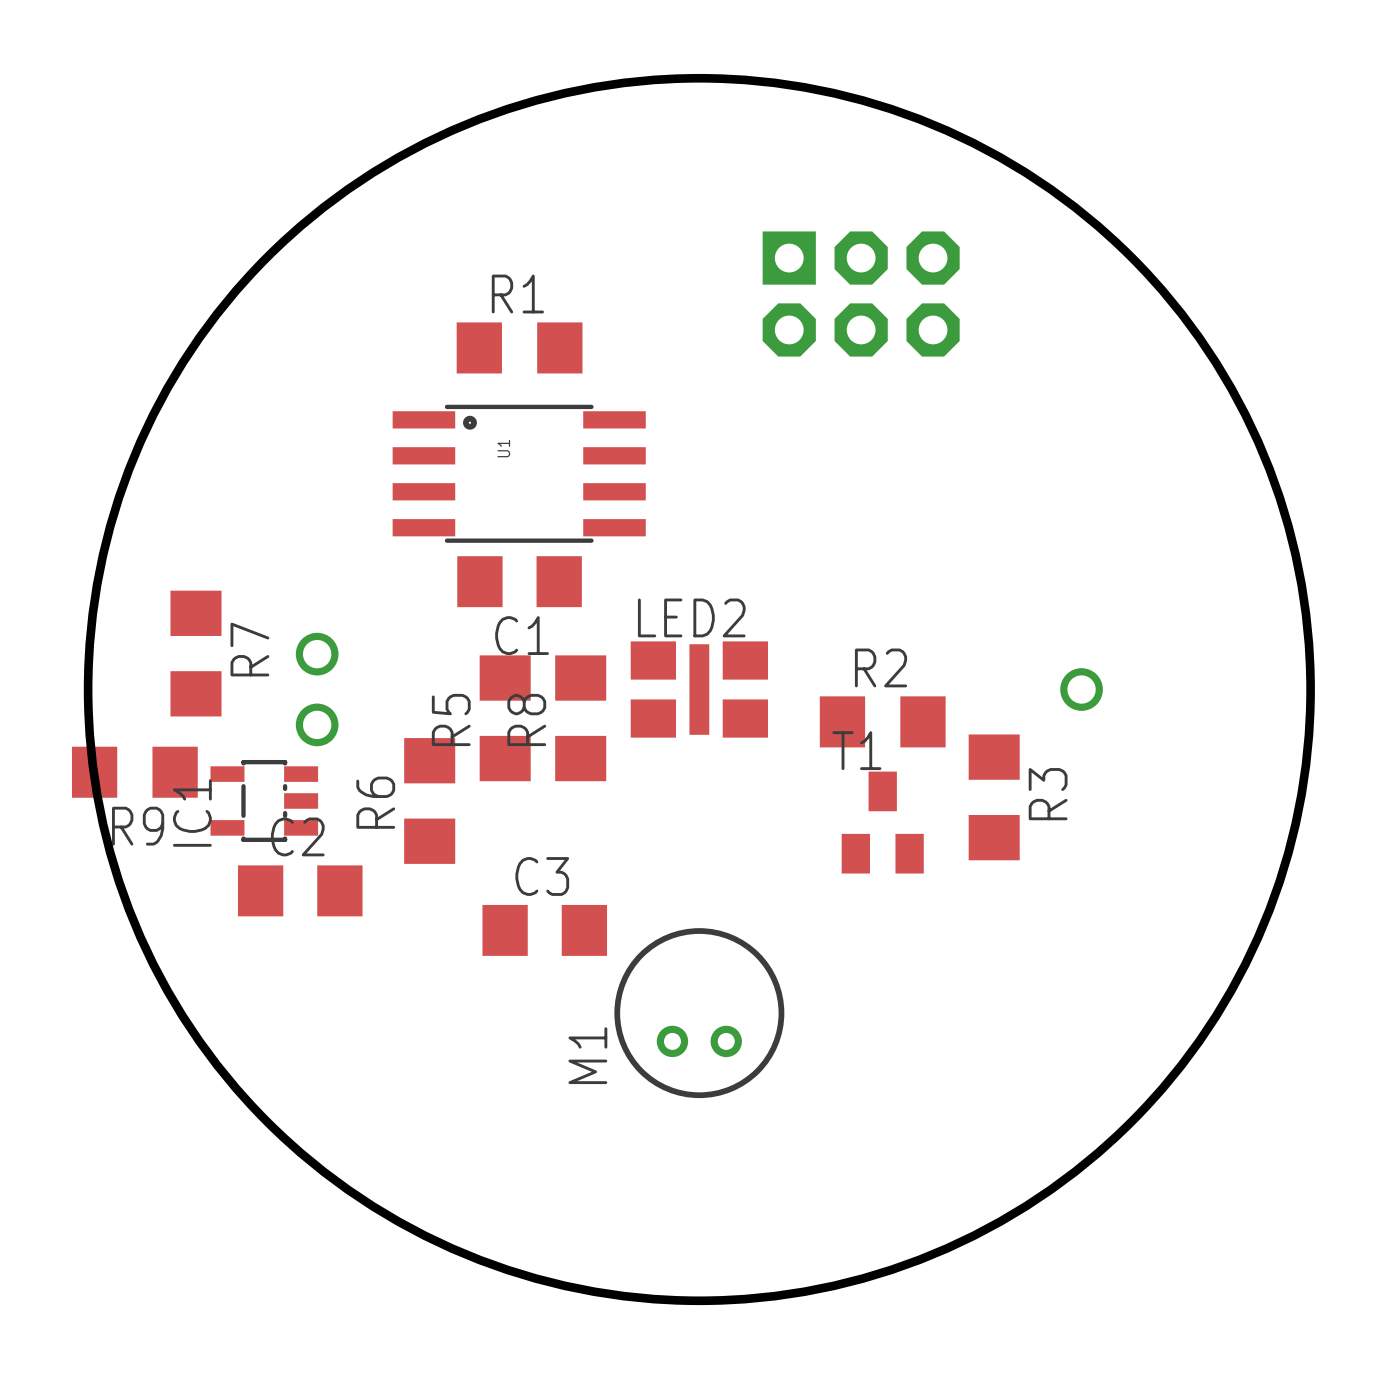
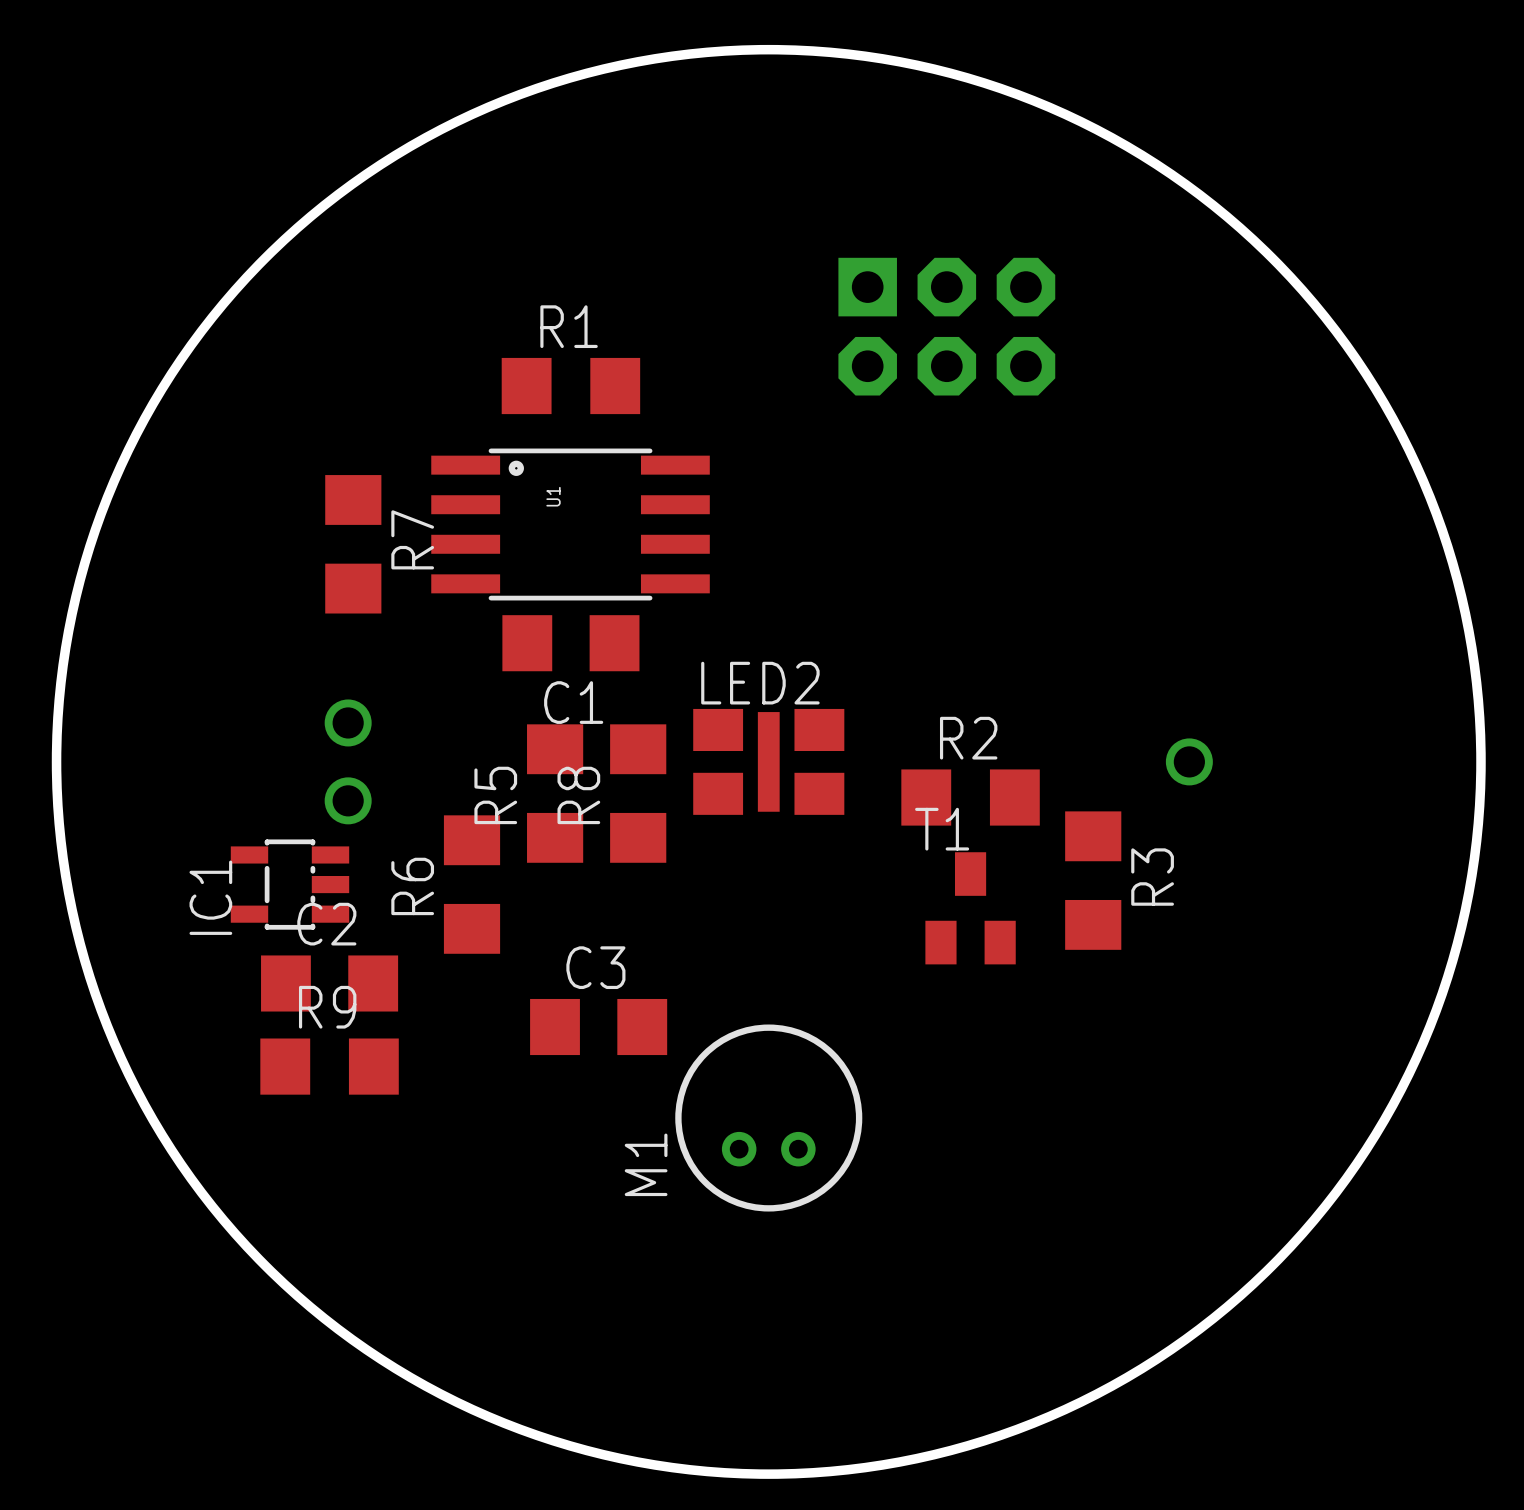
round board edge size: [83, 73, 1315, 1306] -> [51, 44, 1486, 1479]
R7 position: (195, 653) -> (353, 544)
R9 position: (134, 772) -> (329, 1066)
R9 name position: R9 (138, 826) -> R9 (327, 1007)

